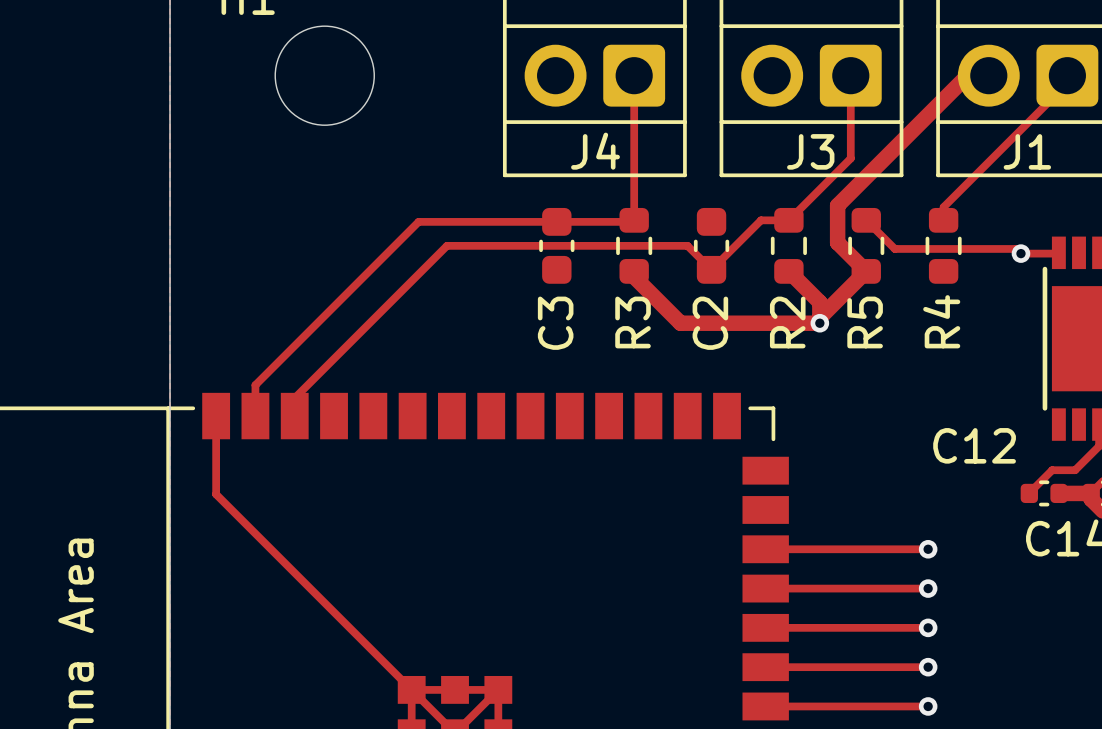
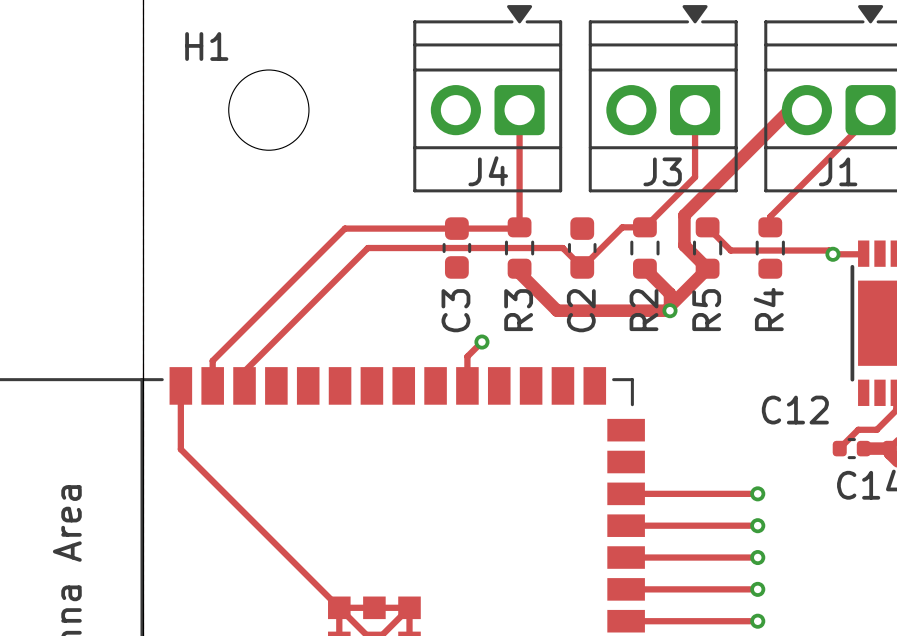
track: none -> (481, 342) (467, 356) (467, 385)
via: none -> (481, 342)

